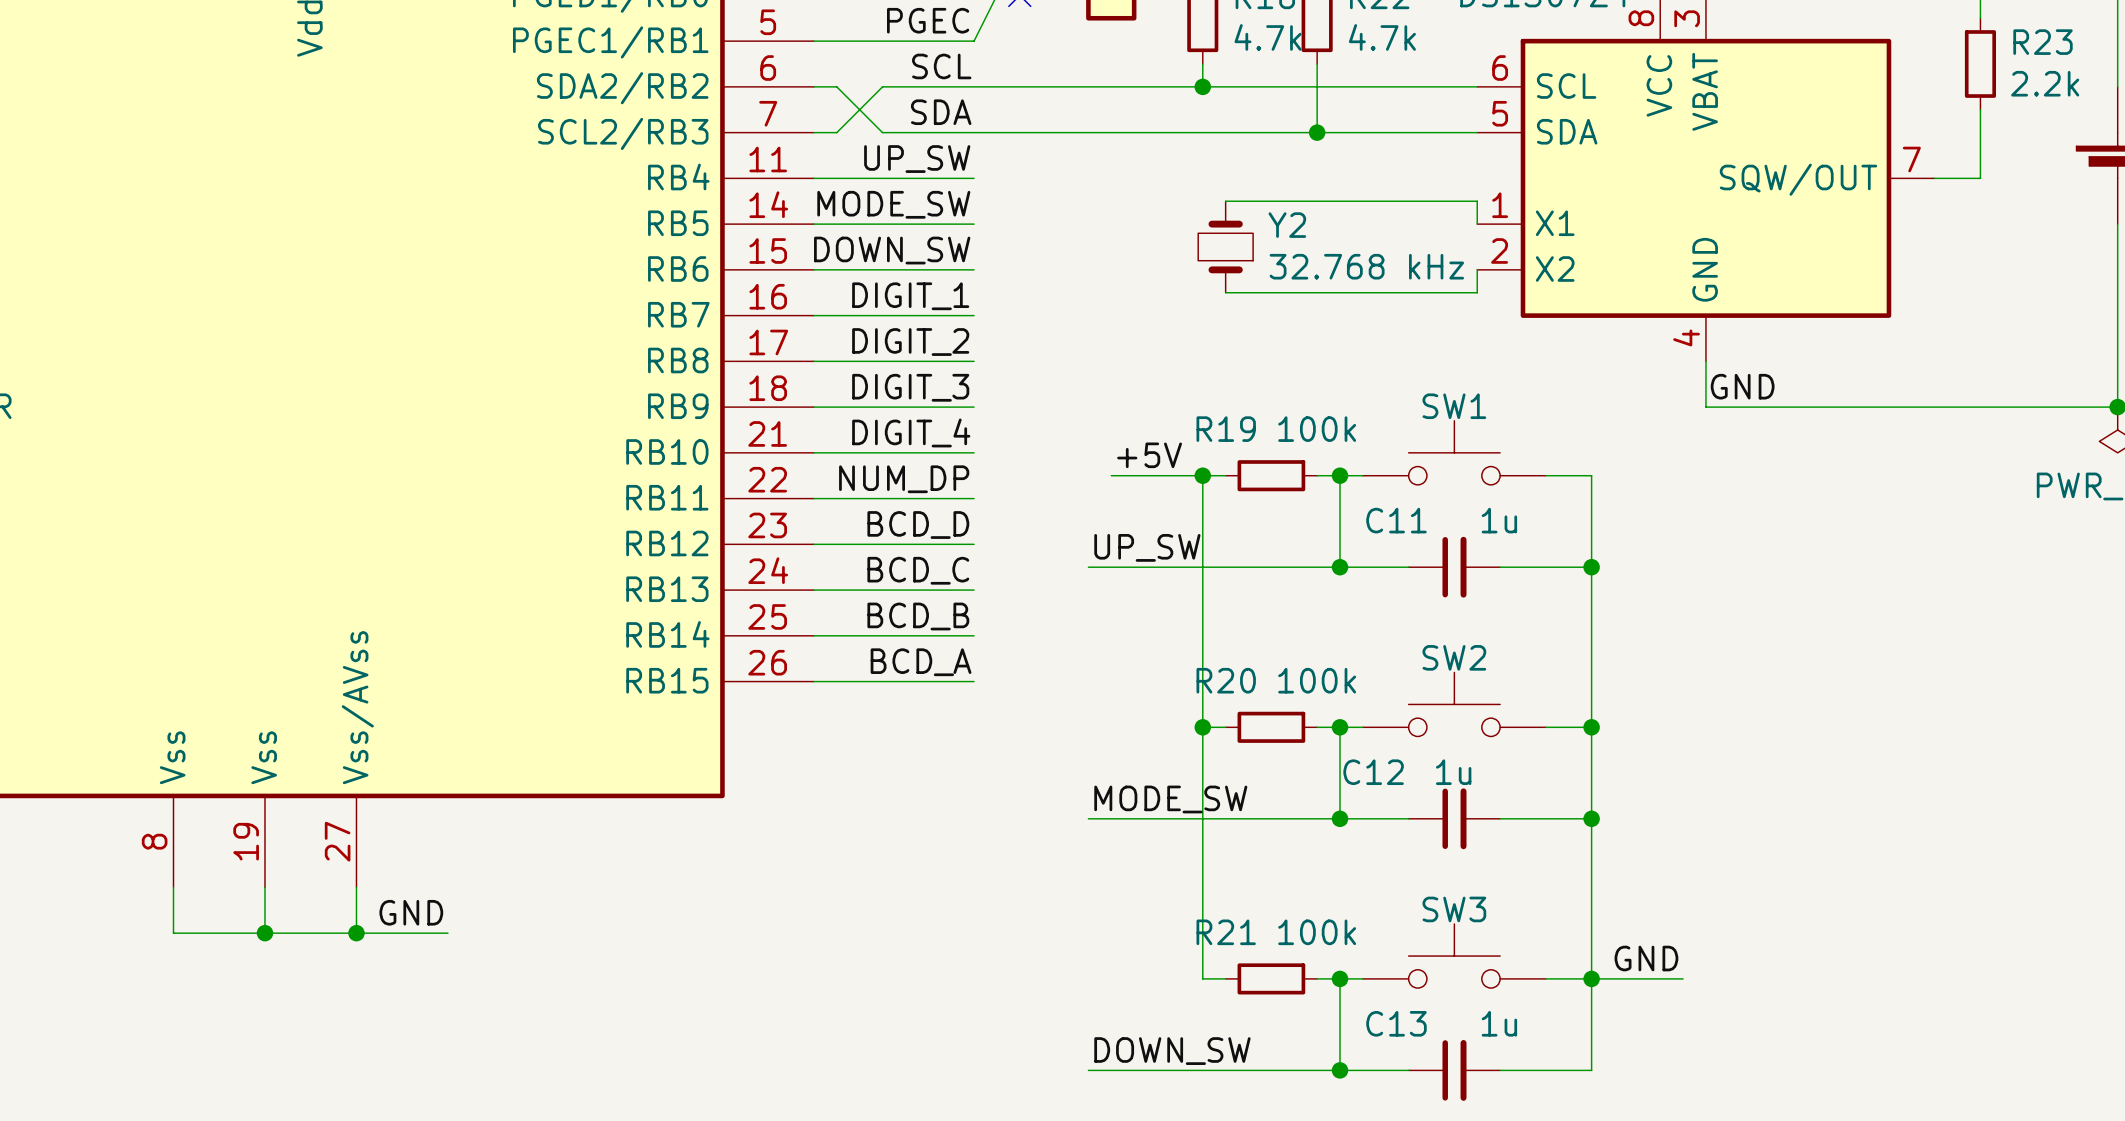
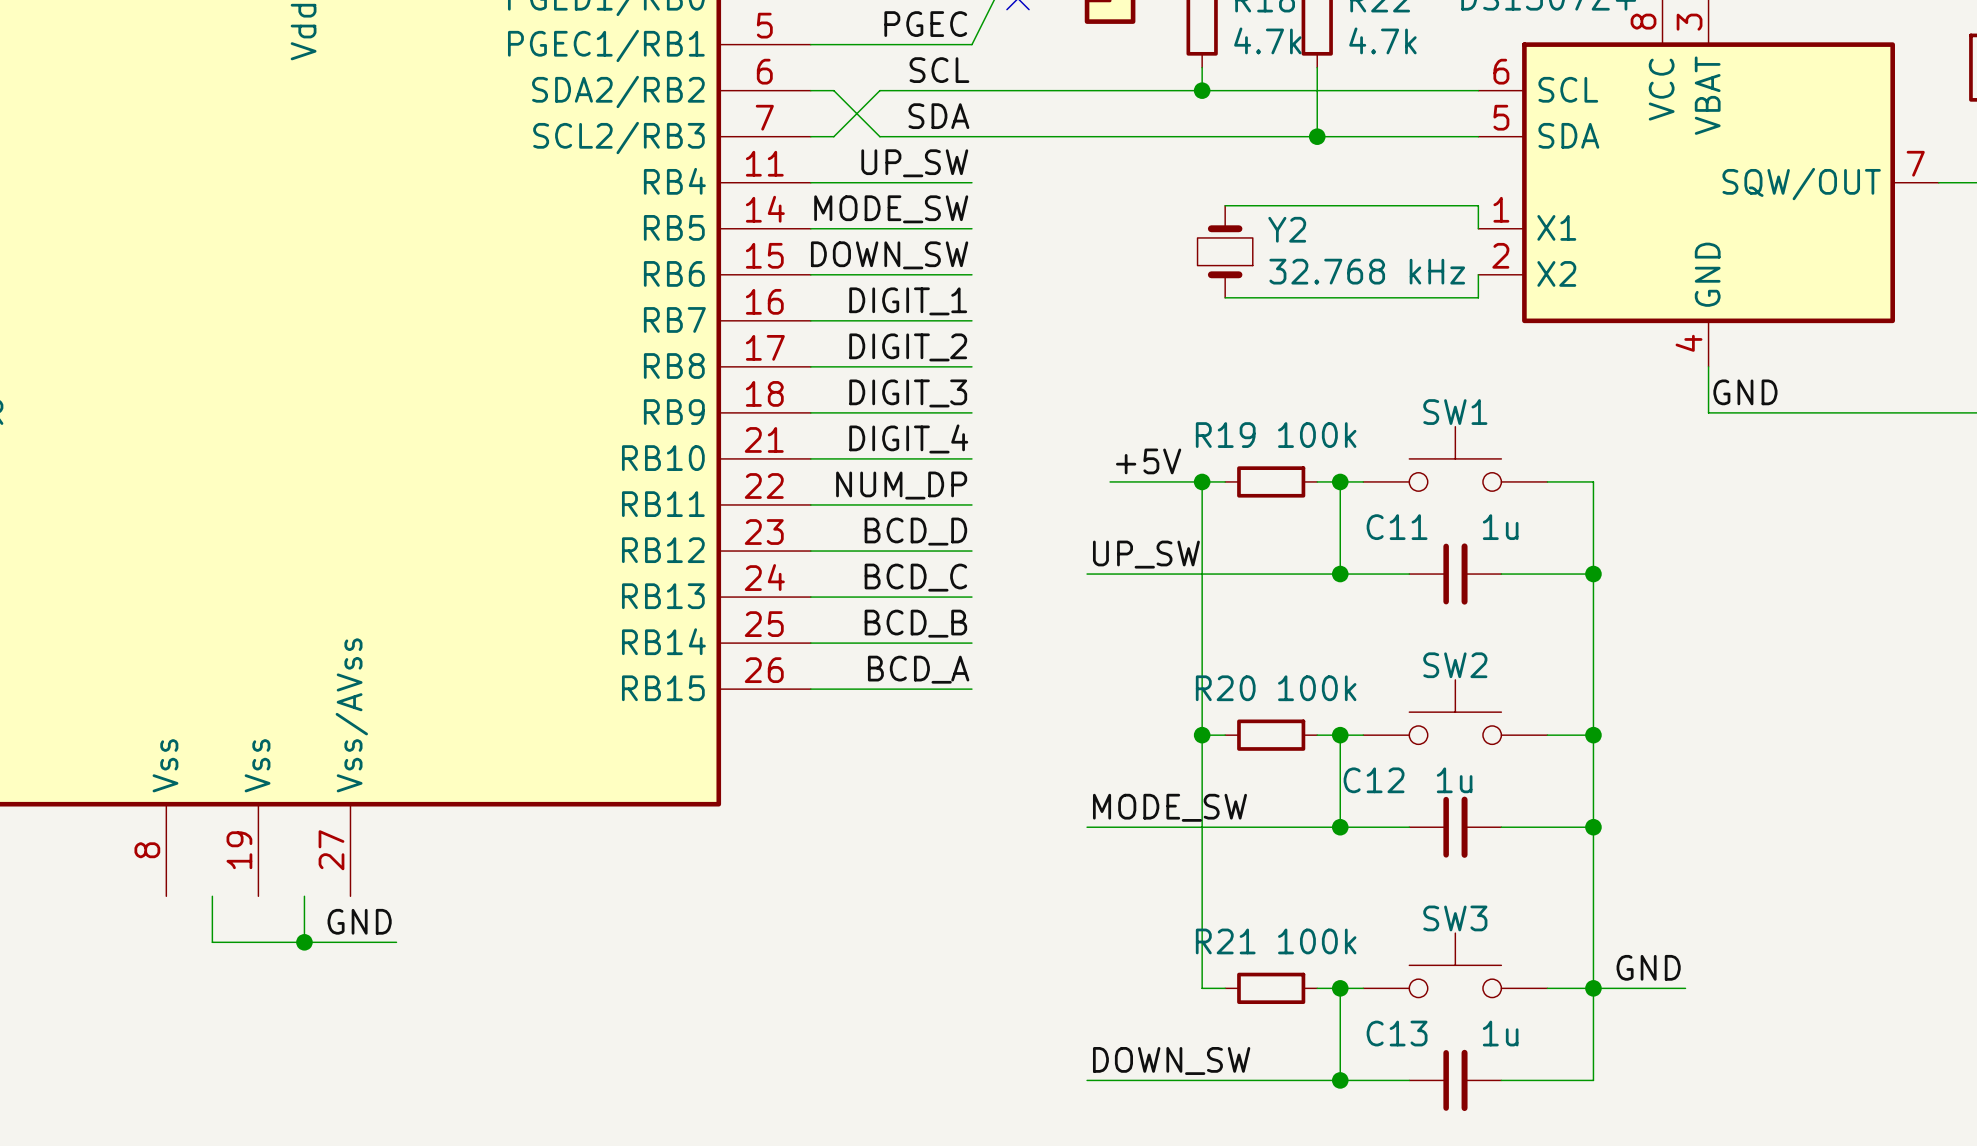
wire: (173, 887) (173, 933) (219, 933) -> (212, 896) (212, 942)
wire: (264, 887) (264, 933) -> none
wire: (356, 887) (356, 933) -> (304, 896) (304, 942)
label position: GND (411, 912) -> GND (359, 921)
junction: (264, 933) -> none
junction: none -> (304, 942)
junction: (356, 933) -> none
wire: (402, 933) (447, 933) -> none

